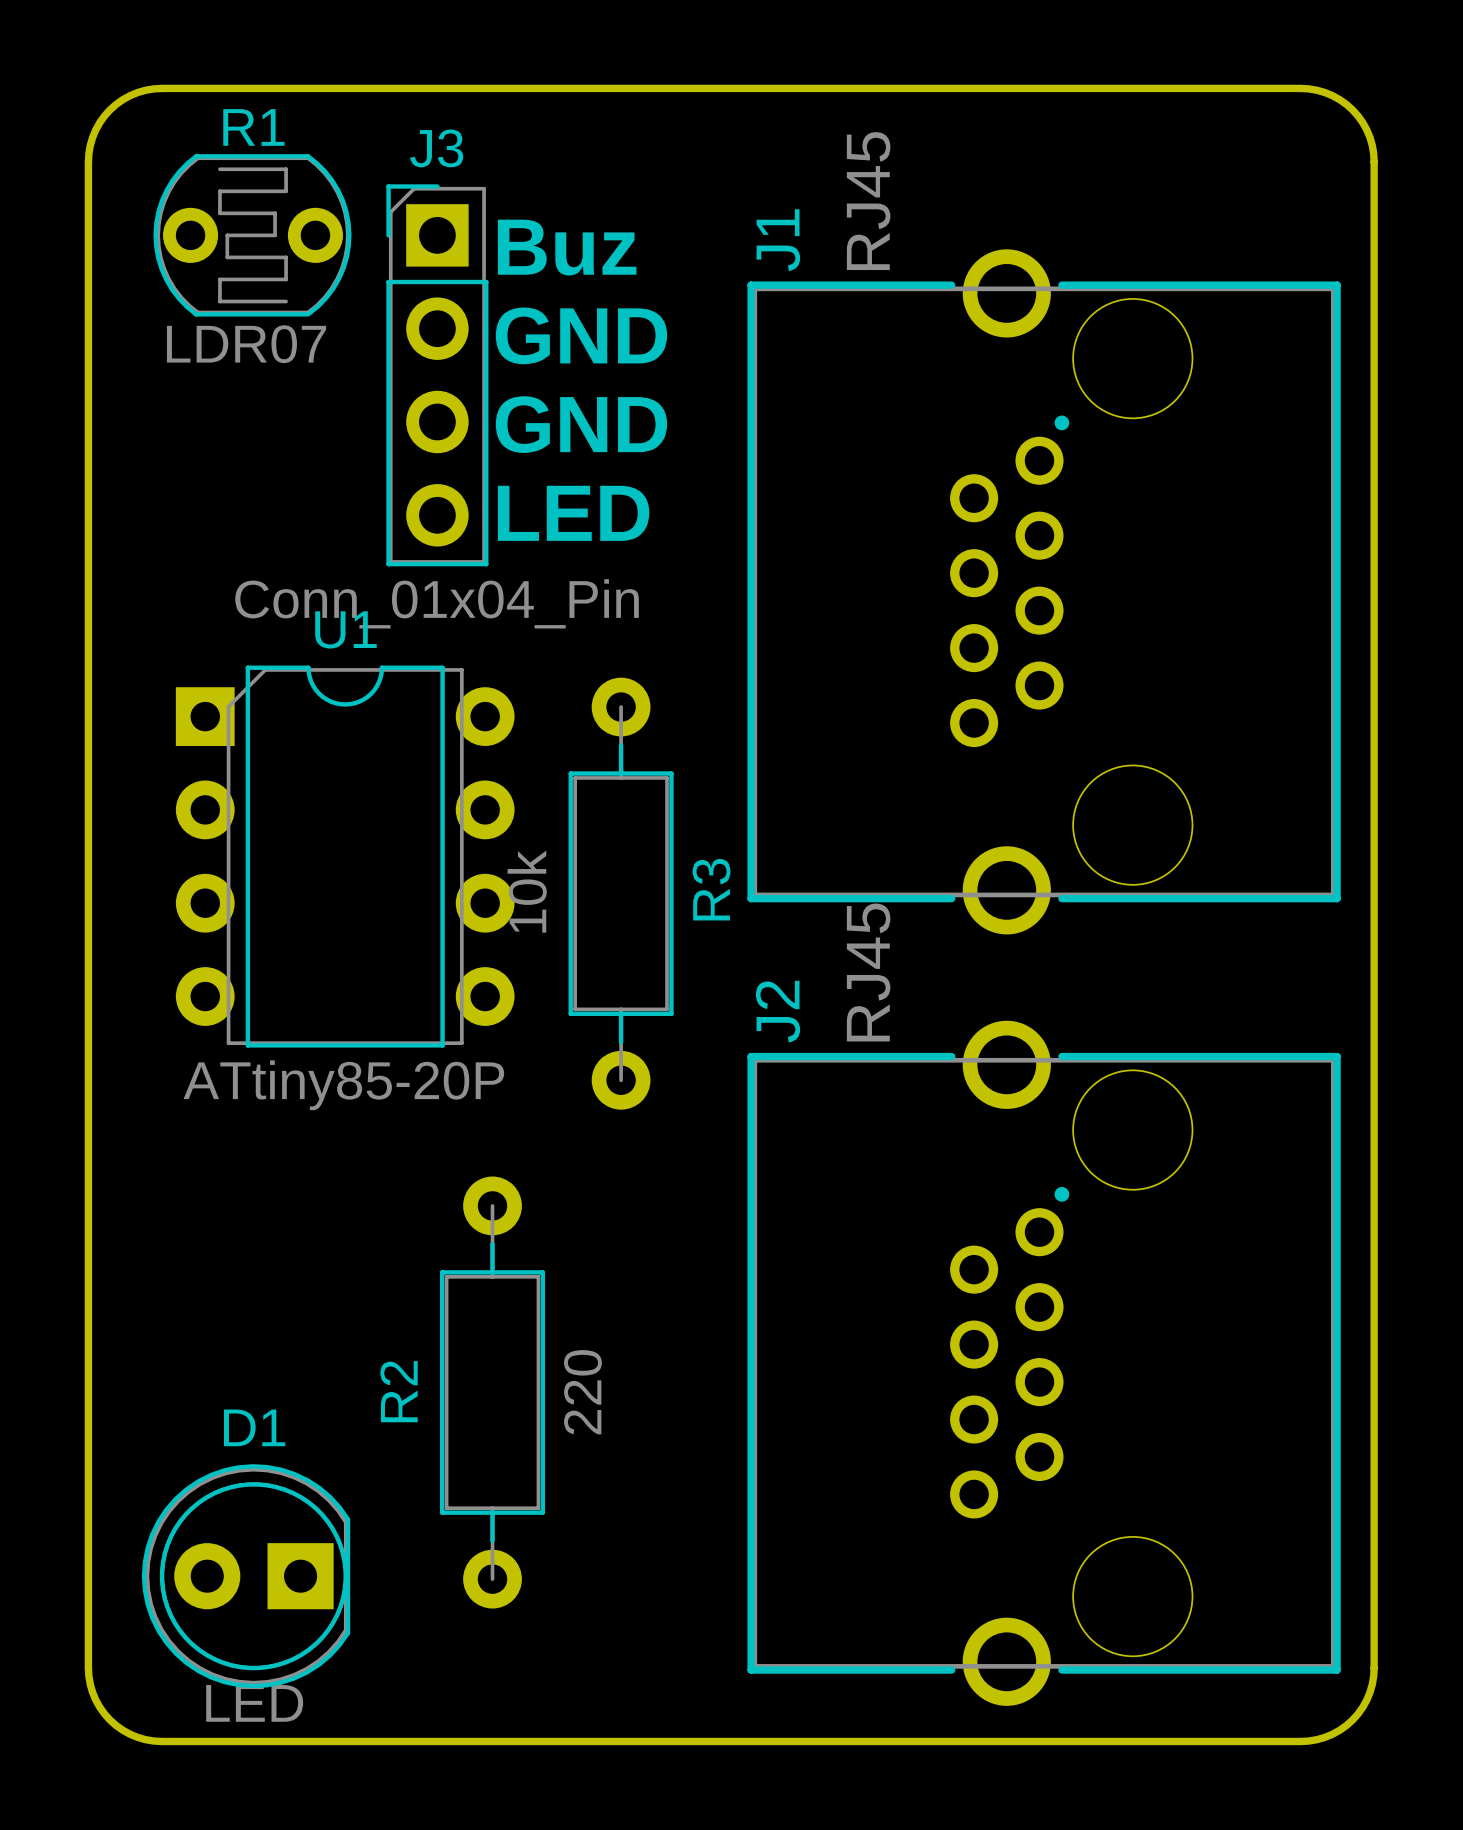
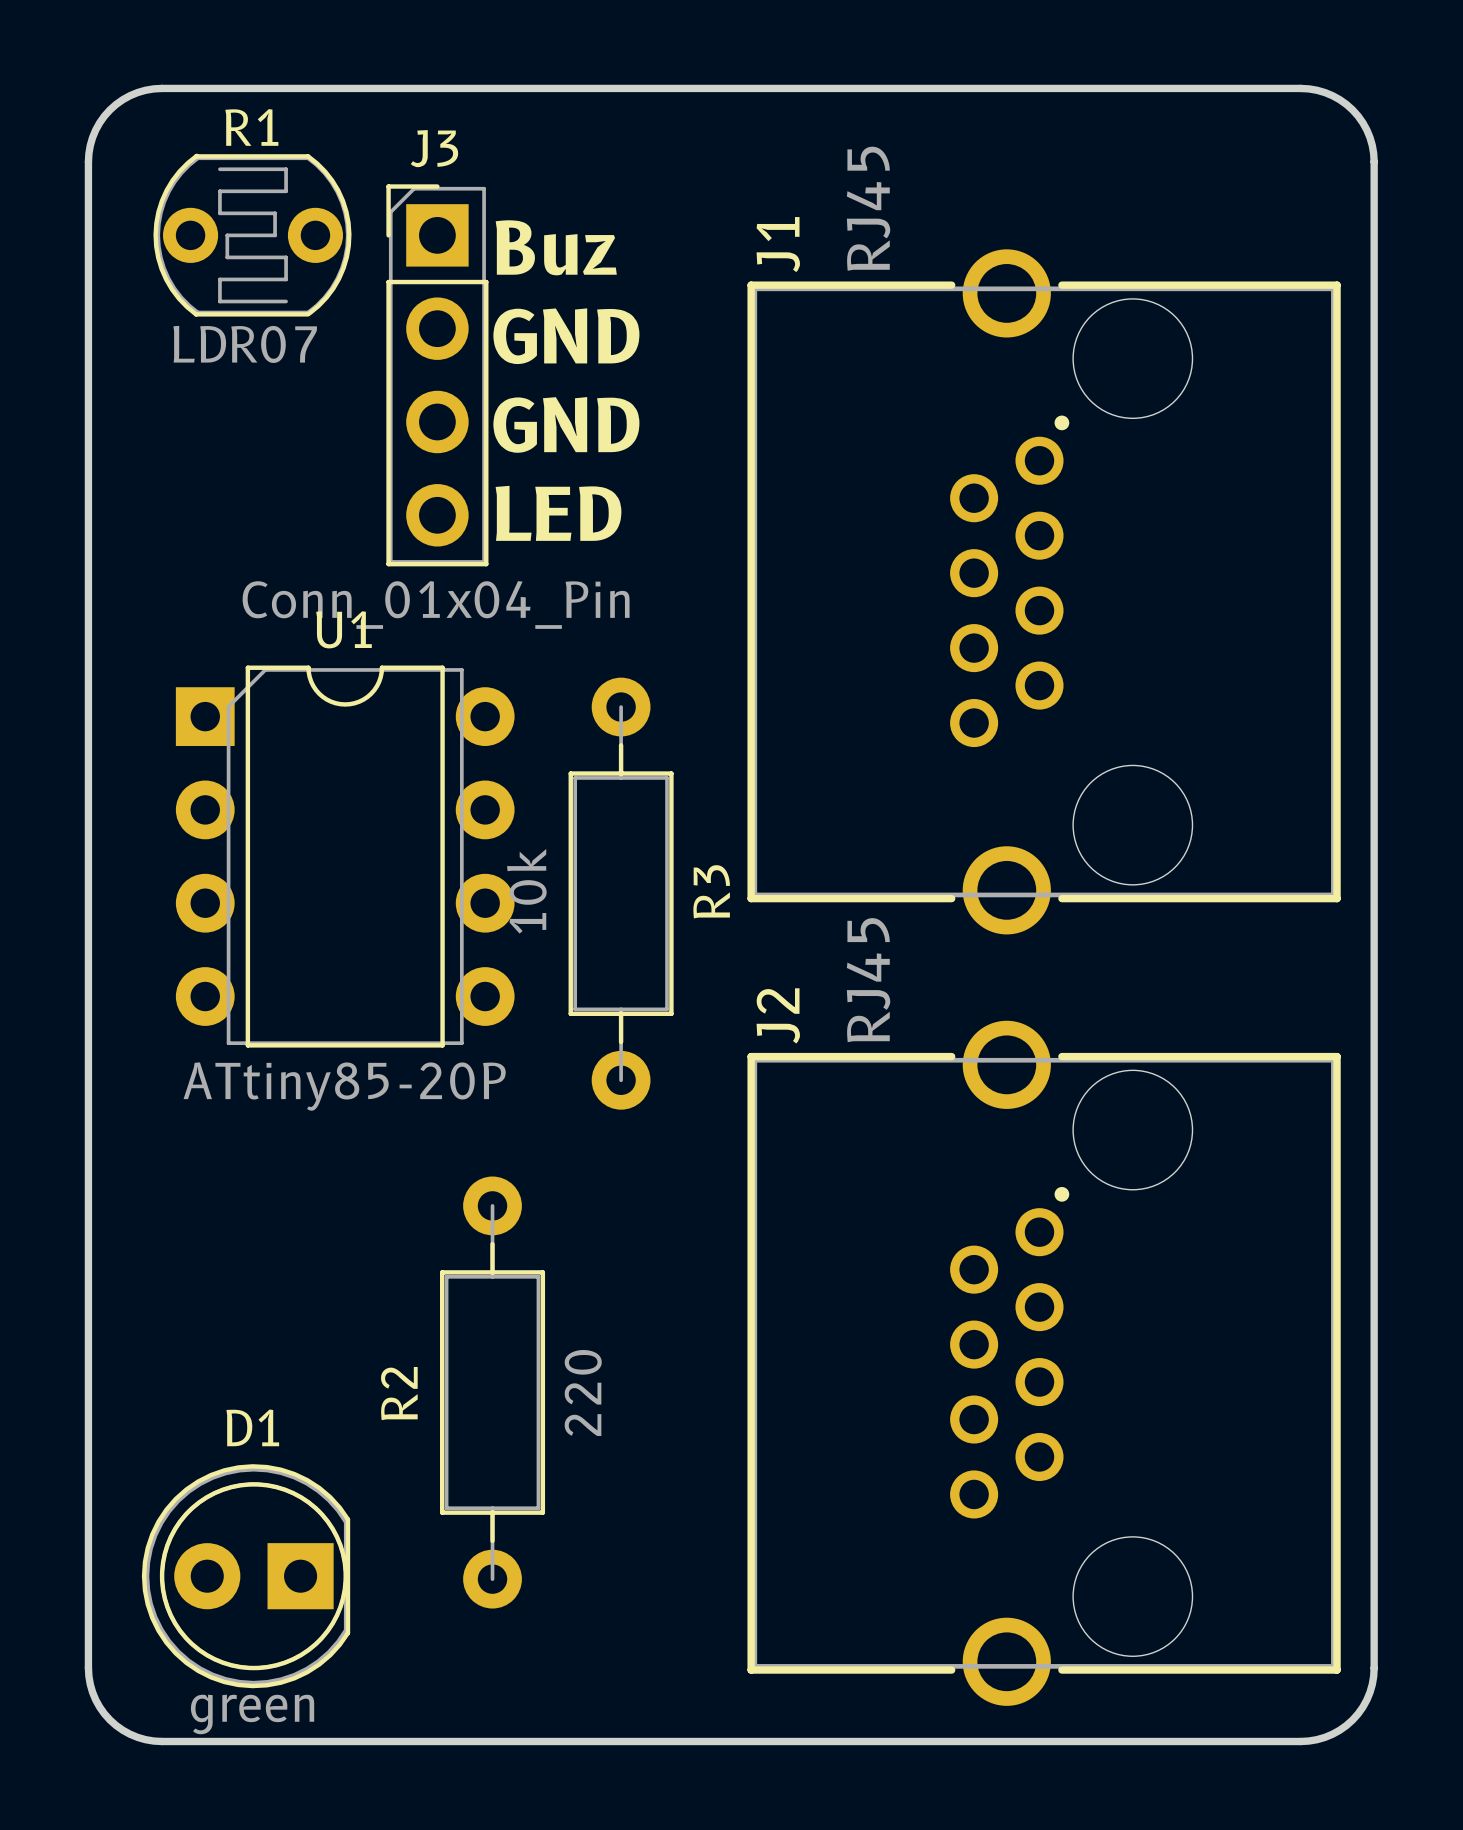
D1 value: LED (254, 1703) -> green (252, 1714)

